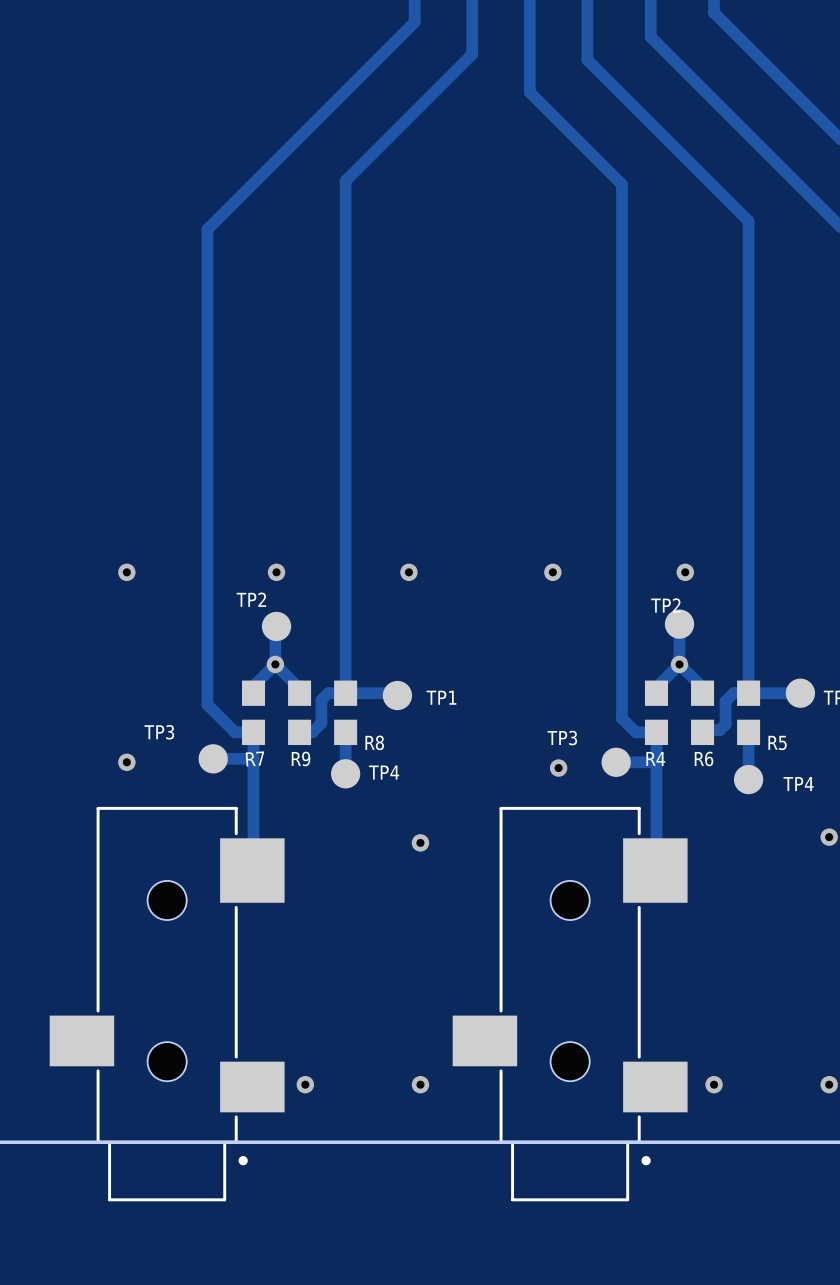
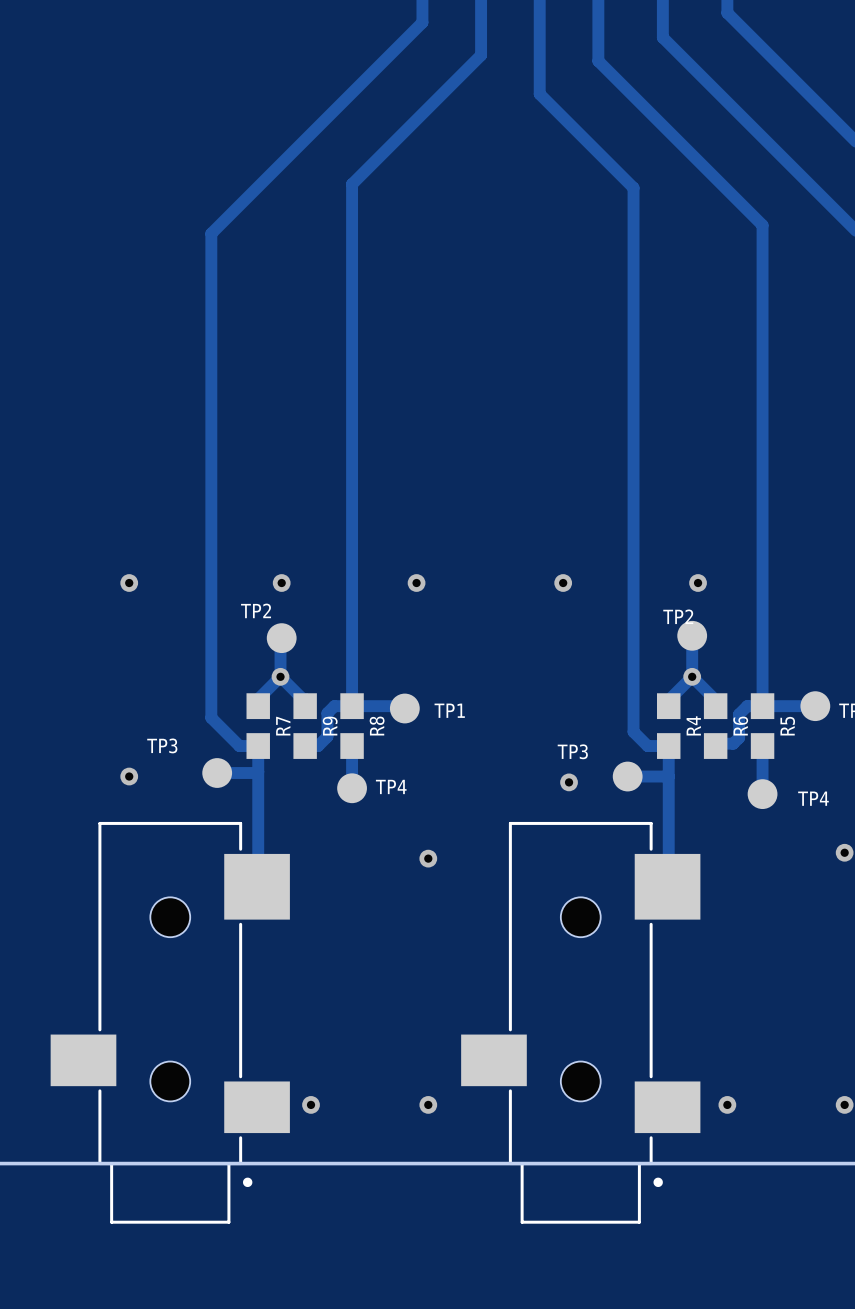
R8 name rotation: 0° (374, 742) -> 90° counterclockwise (377, 726)
R5 name rotation: 0° (777, 742) -> 90° counterclockwise (787, 726)
R7 name rotation: 0° (254, 758) -> 86.5° counterclockwise (283, 726)
R7 name position: R7 (254, 758) -> R7 (283, 726)
R9 name rotation: 0° (301, 758) -> 90° counterclockwise (330, 726)
R9 name position: R9 (301, 758) -> R9 (330, 726)
R4 name rotation: 0° (655, 758) -> 90° counterclockwise (693, 725)
R4 name position: R4 (655, 758) -> R4 (693, 725)
R6 name rotation: 0° (704, 758) -> 90° counterclockwise (740, 726)
R6 name position: R6 (704, 758) -> R6 (740, 726)

